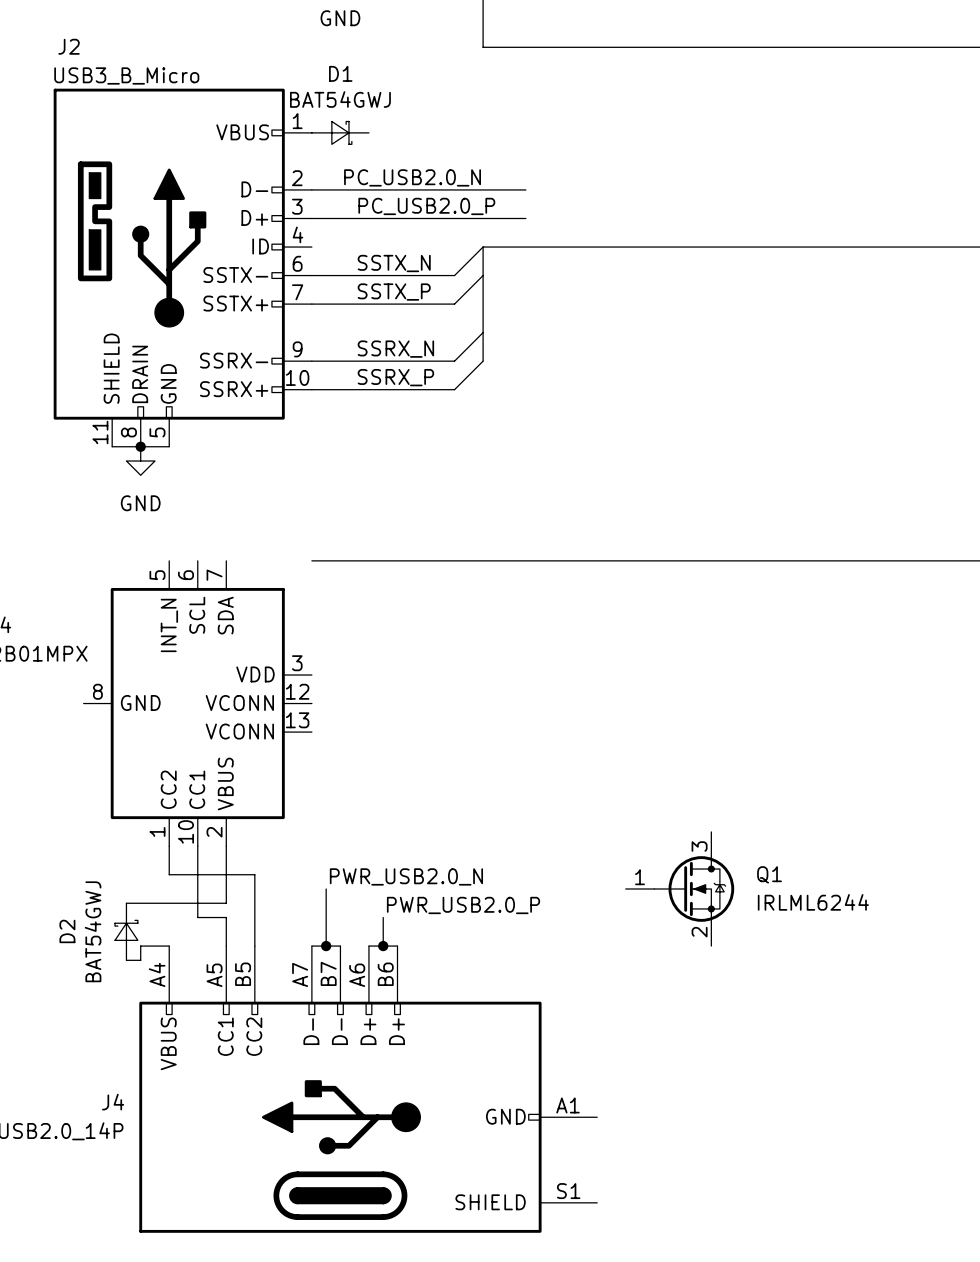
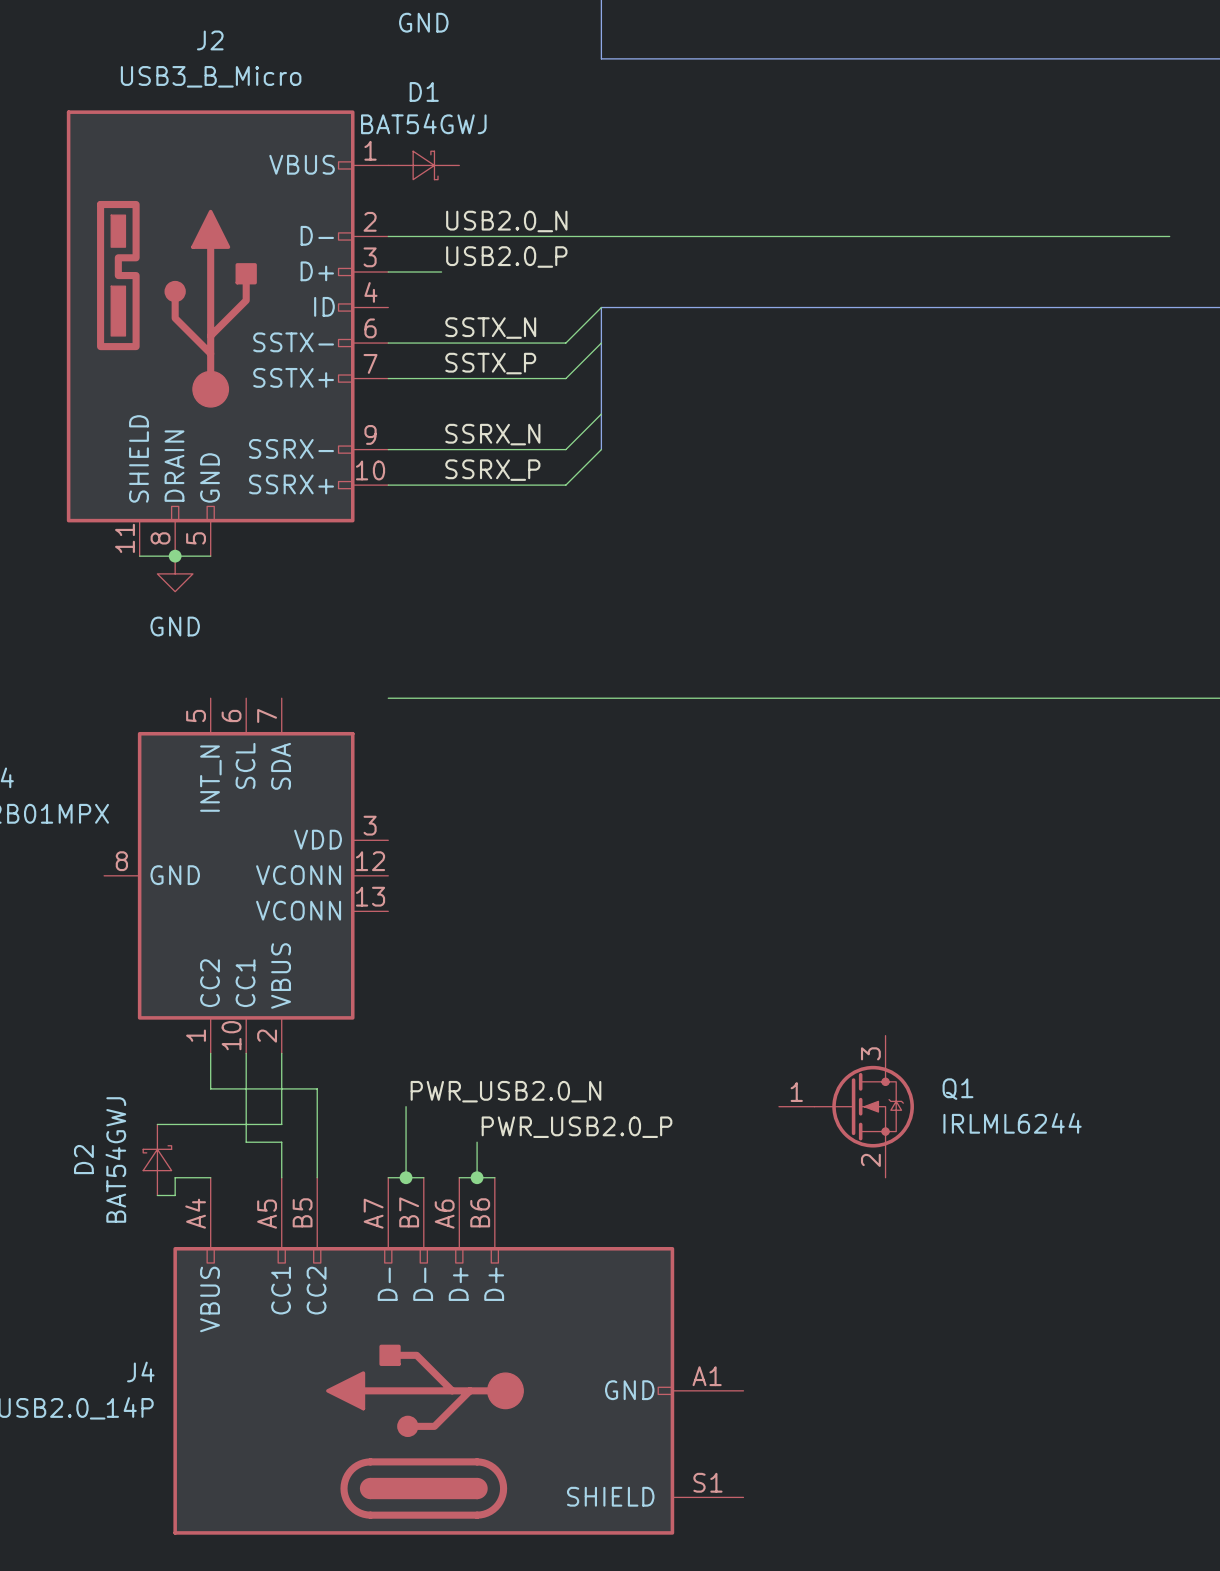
J2 name position: J2 (69, 46) -> J2 (210, 40)
J2 value position: USB3_B_Micro (126, 75) -> USB3_B_Micro (211, 76)
label: PC_USB2.0_N (412, 177) -> USB2.0_N (506, 221)
wire: none -> (654, 236) (1169, 236)
label: PC_USB2.0_P (426, 206) -> USB2.0_P (506, 257)
wire: (354, 218) (525, 218) -> none

